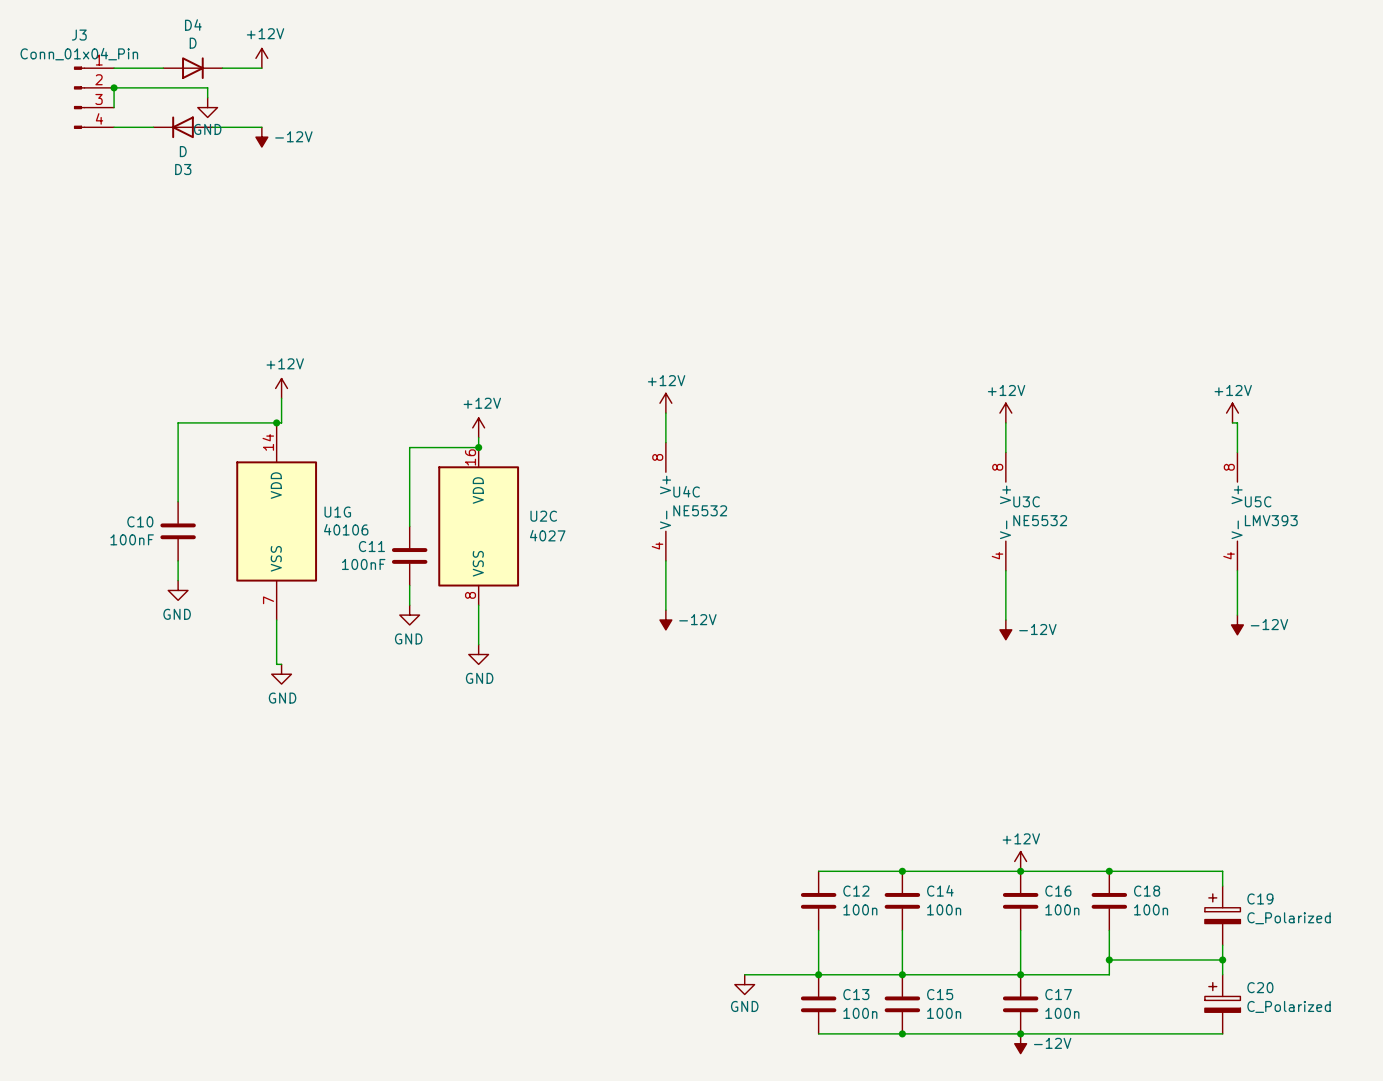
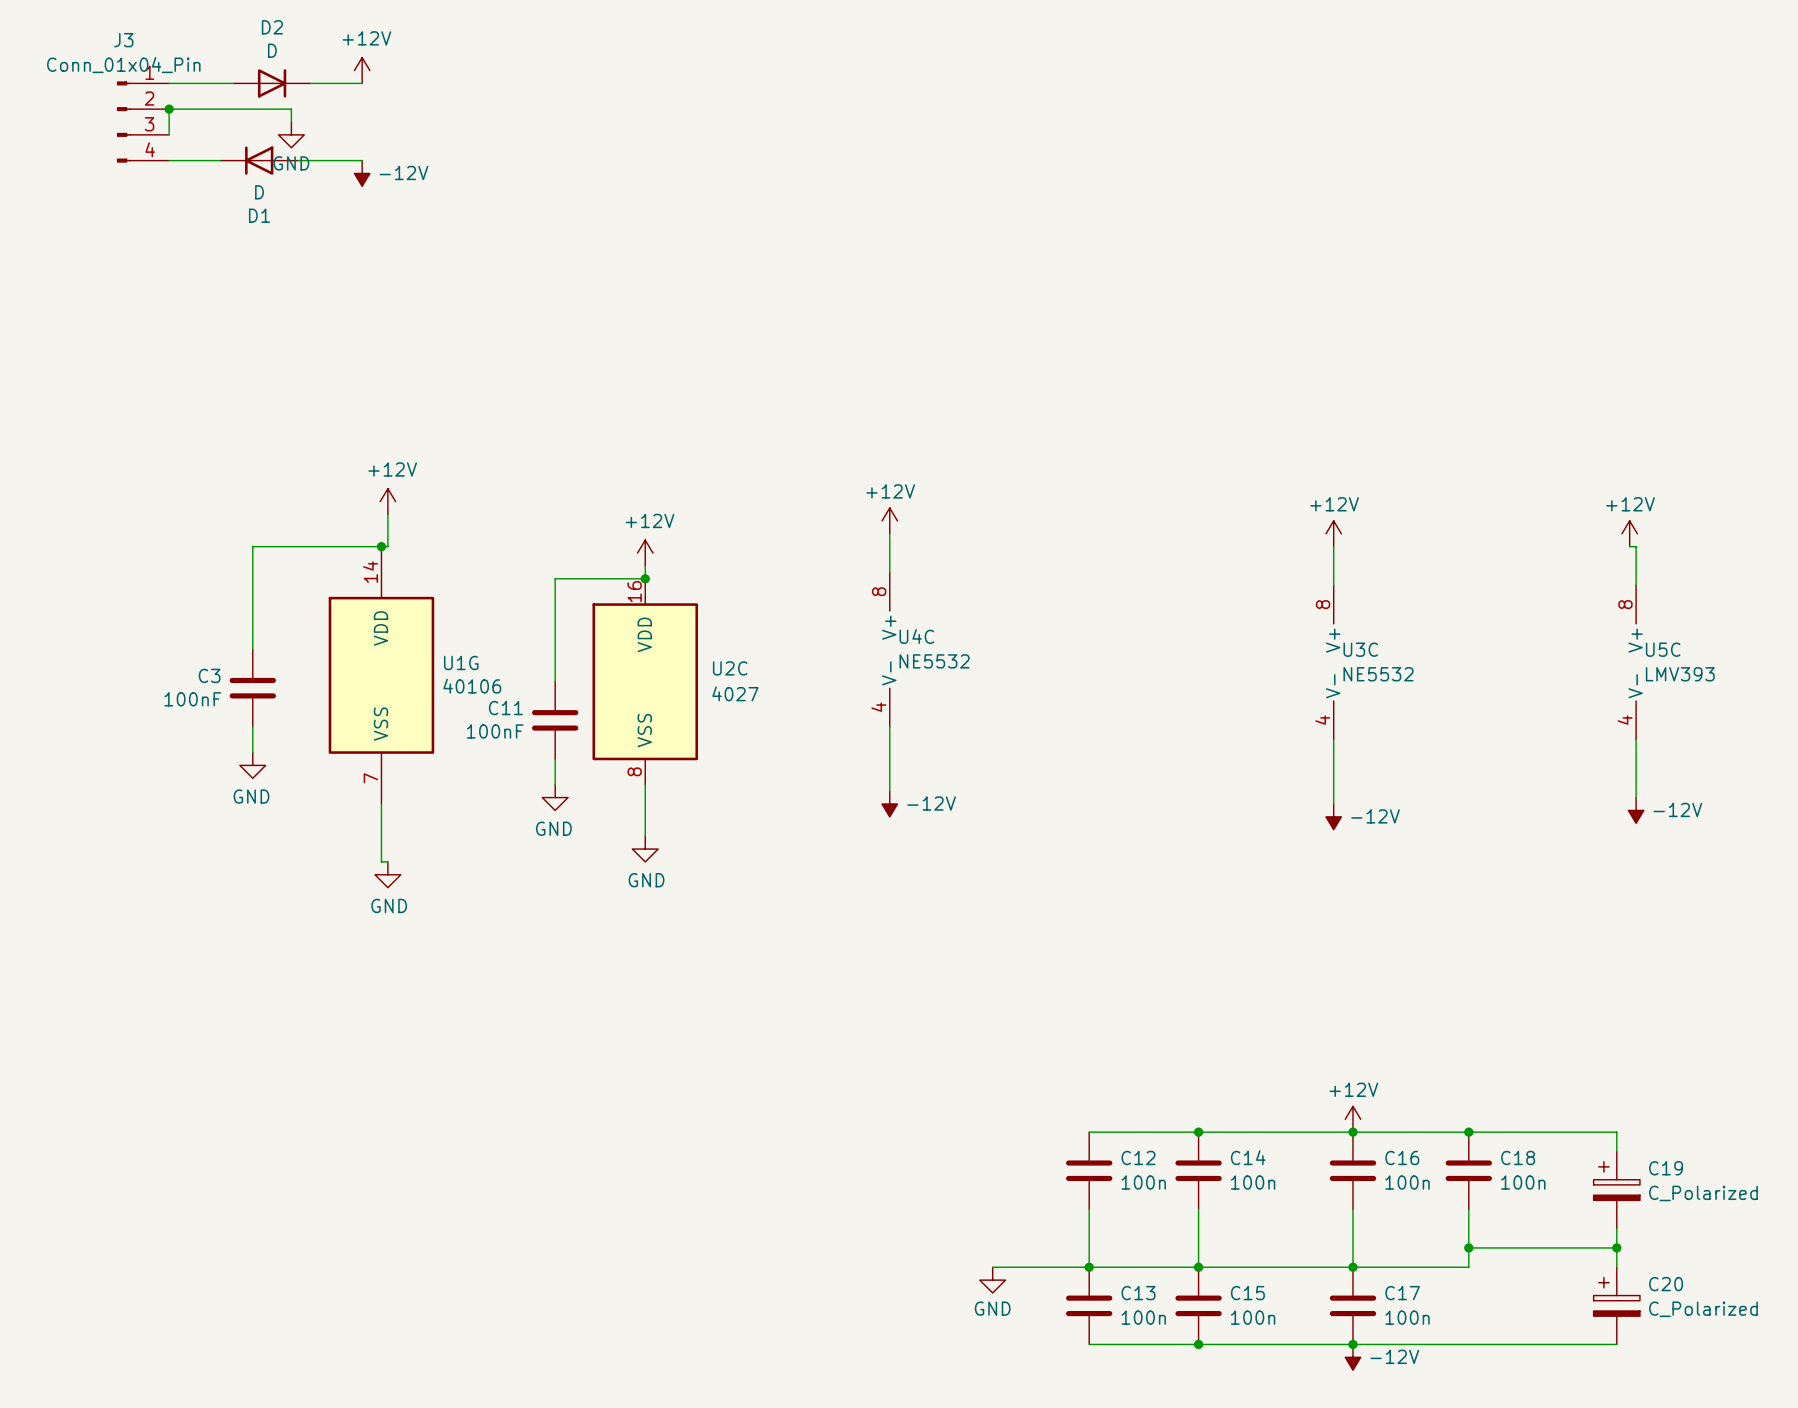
D4 name: D4 (193, 25) -> D2 (272, 27)
D3 name: D3 (183, 169) -> D1 (259, 215)
C10 name: C10 (140, 521) -> C3 (209, 675)

